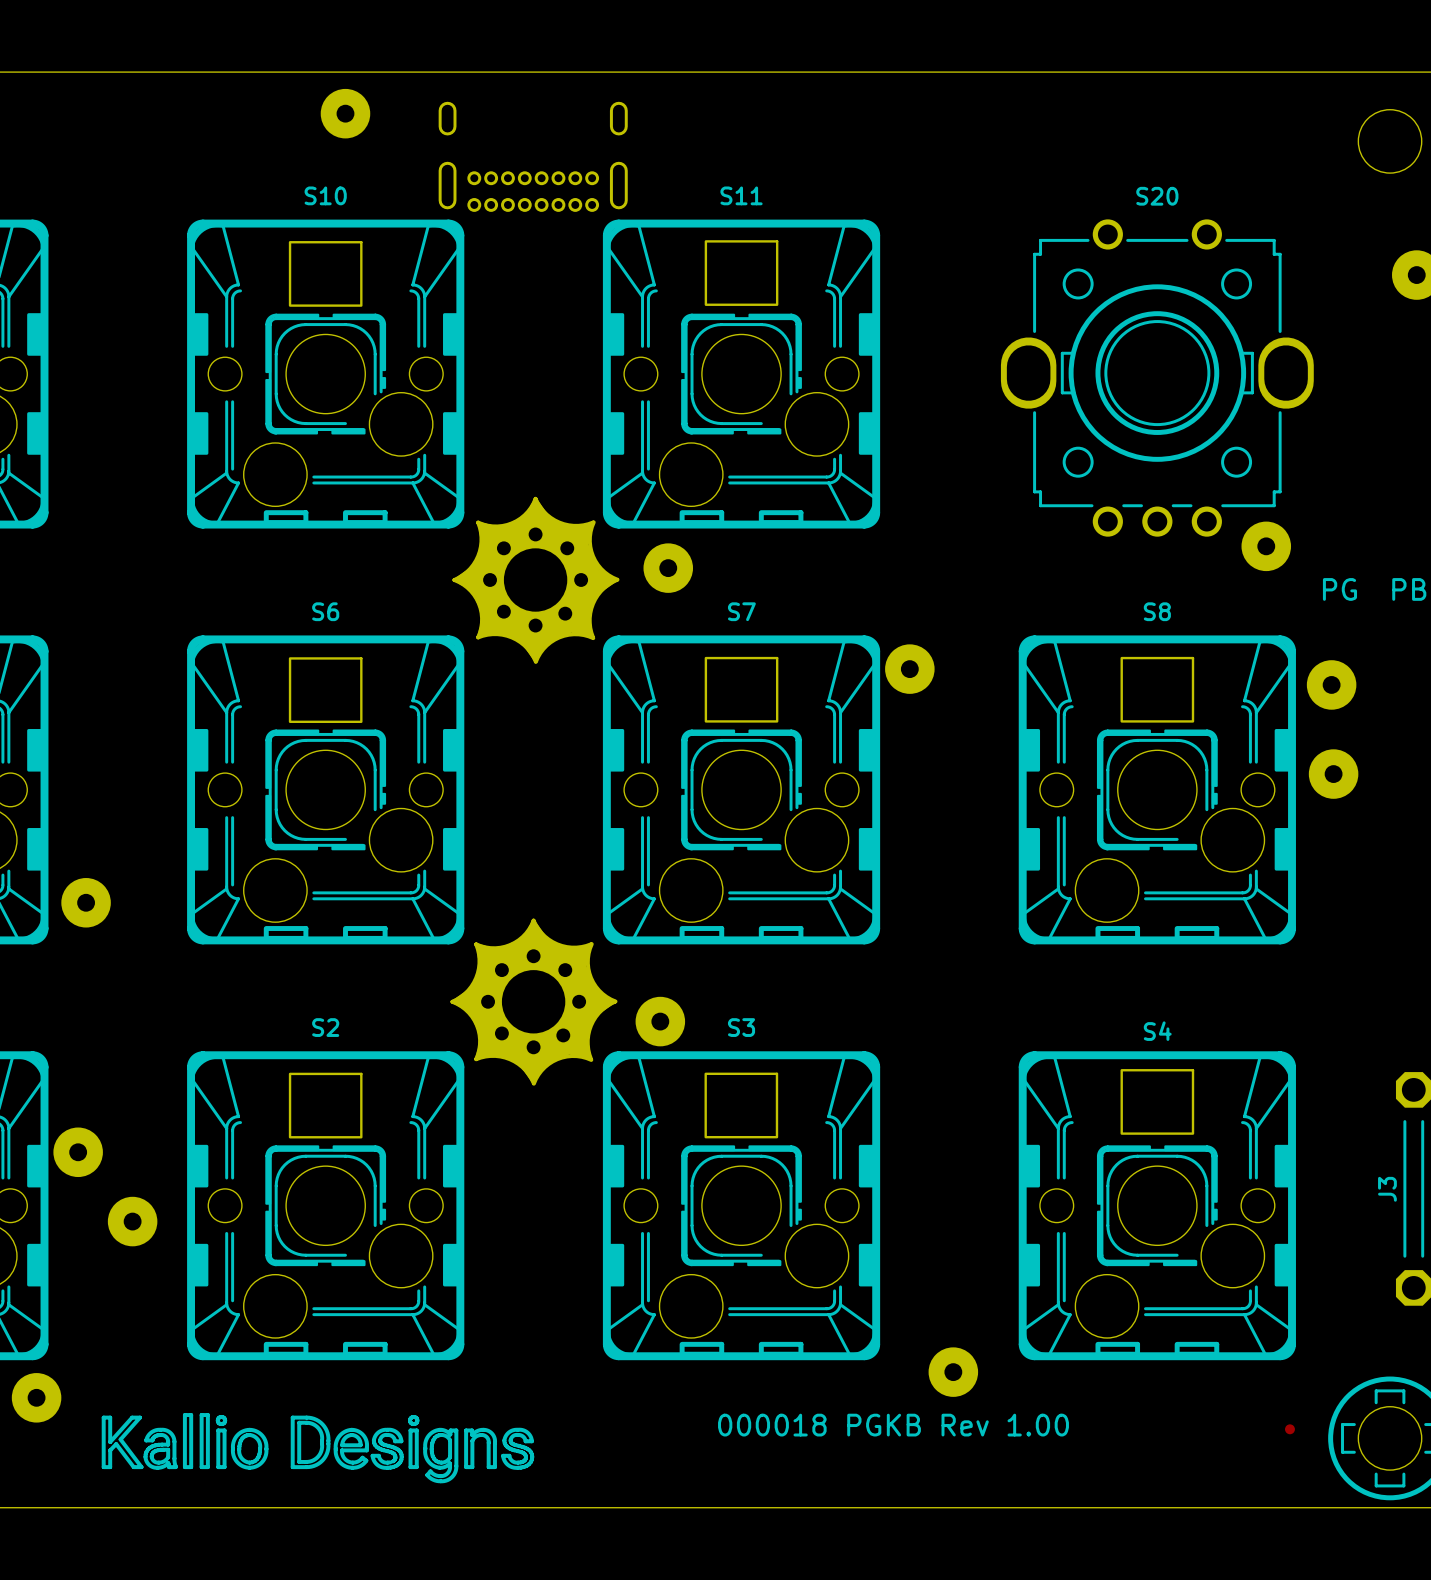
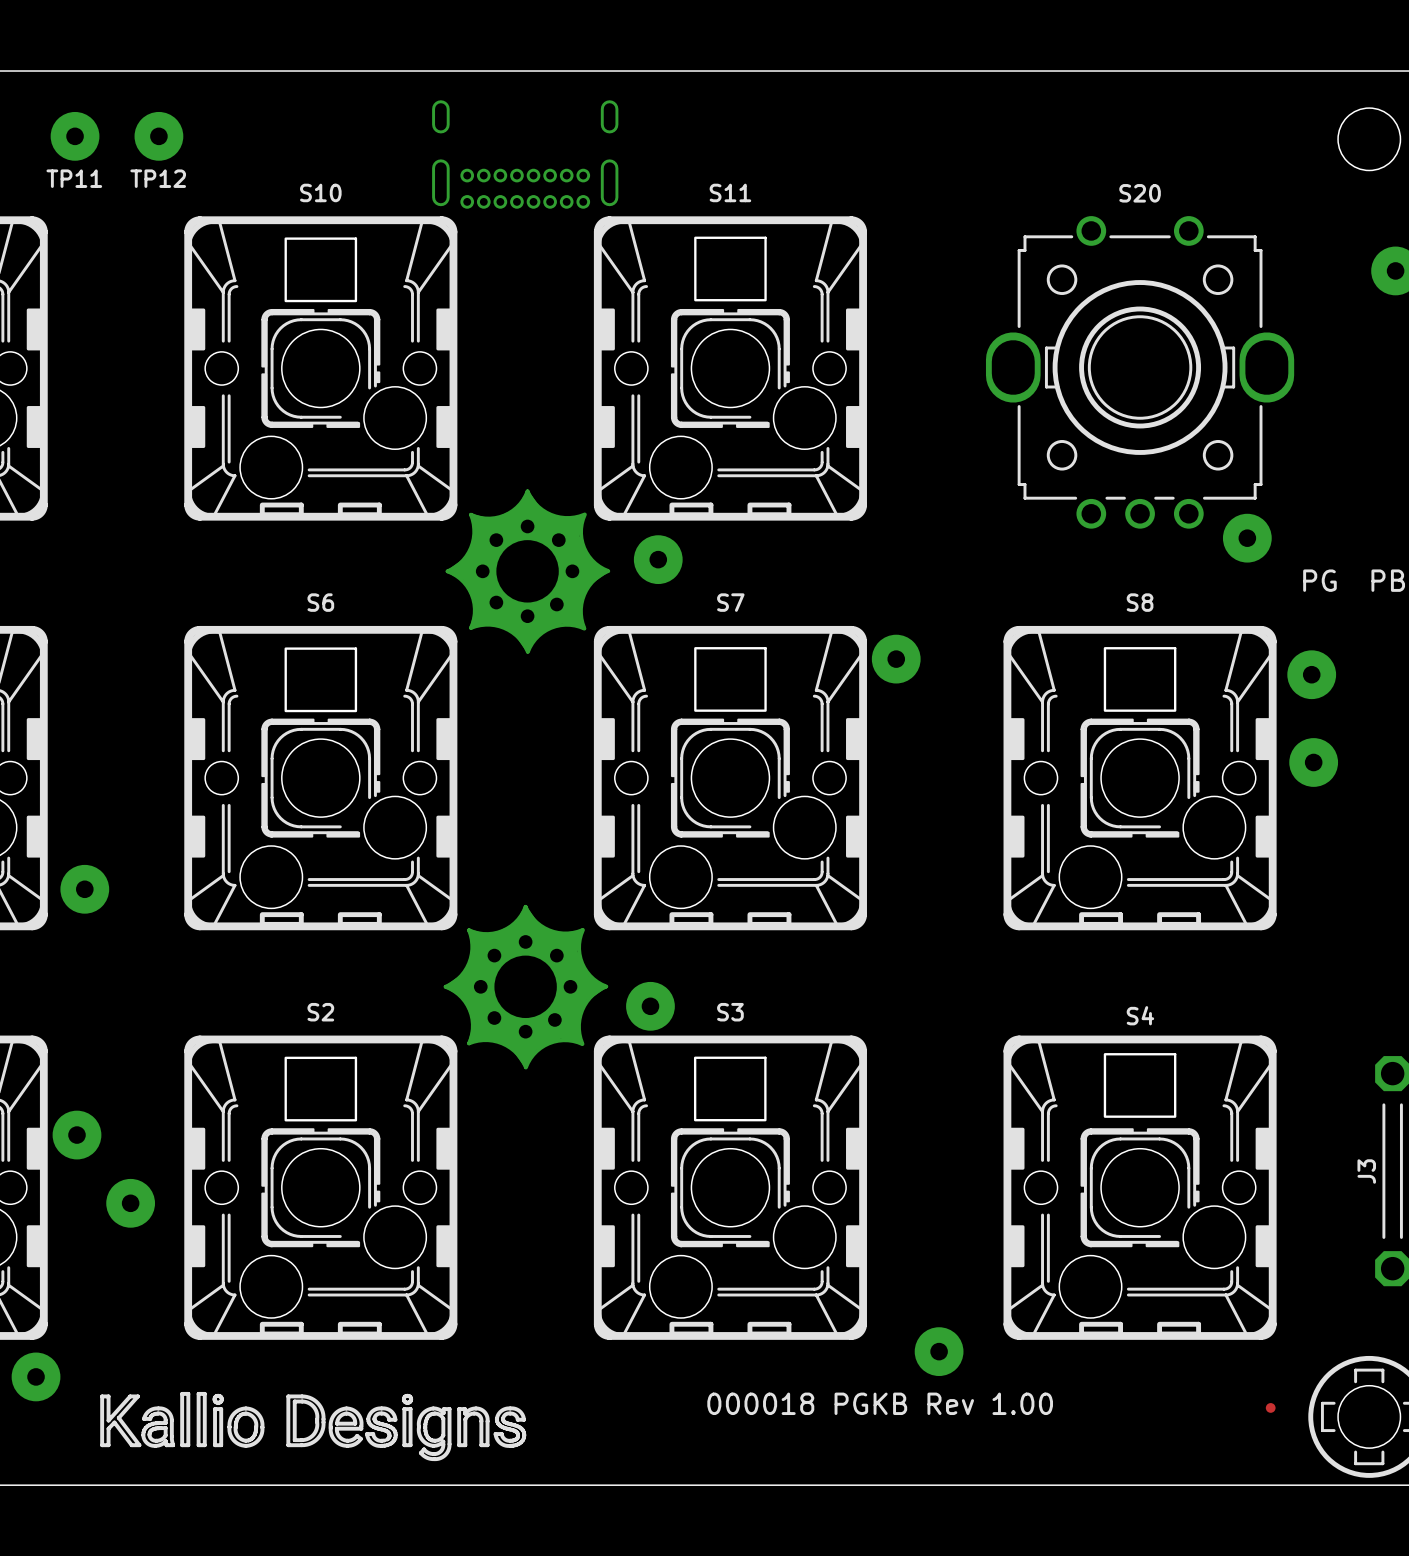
part: (345, 113) -> none
TP11: none -> (75, 136)
TP12: none -> (158, 136)

